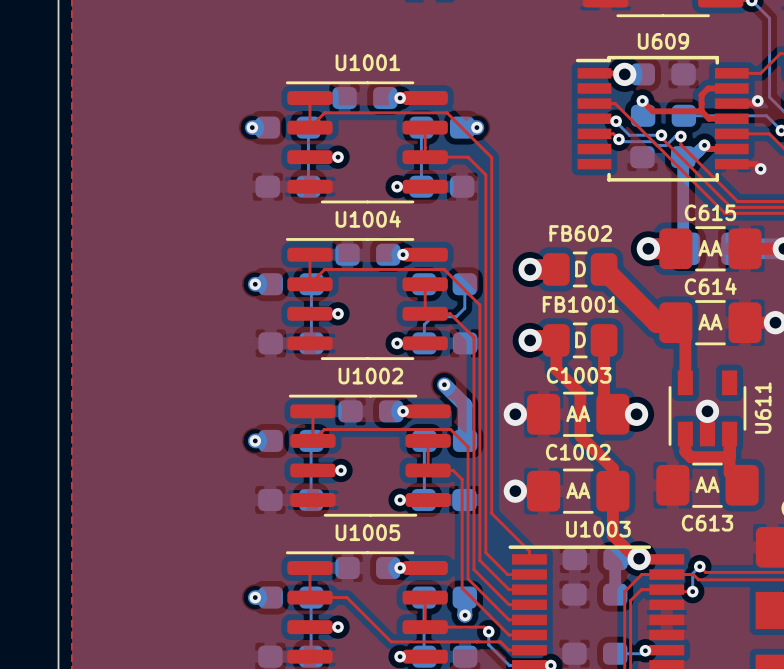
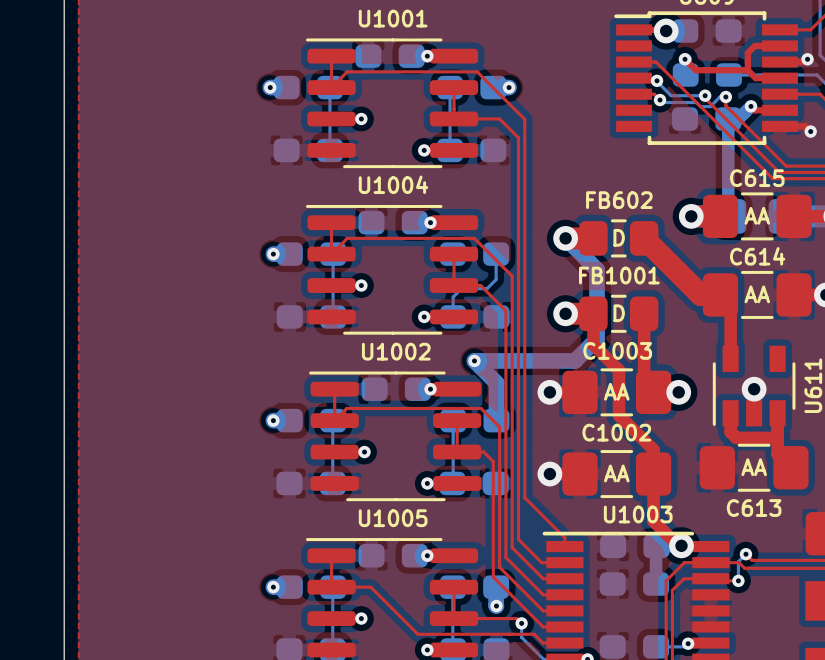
bottom track: none -> (587, 260) (565, 238) (597, 269) (597, 338) (575, 360) (474, 360)

